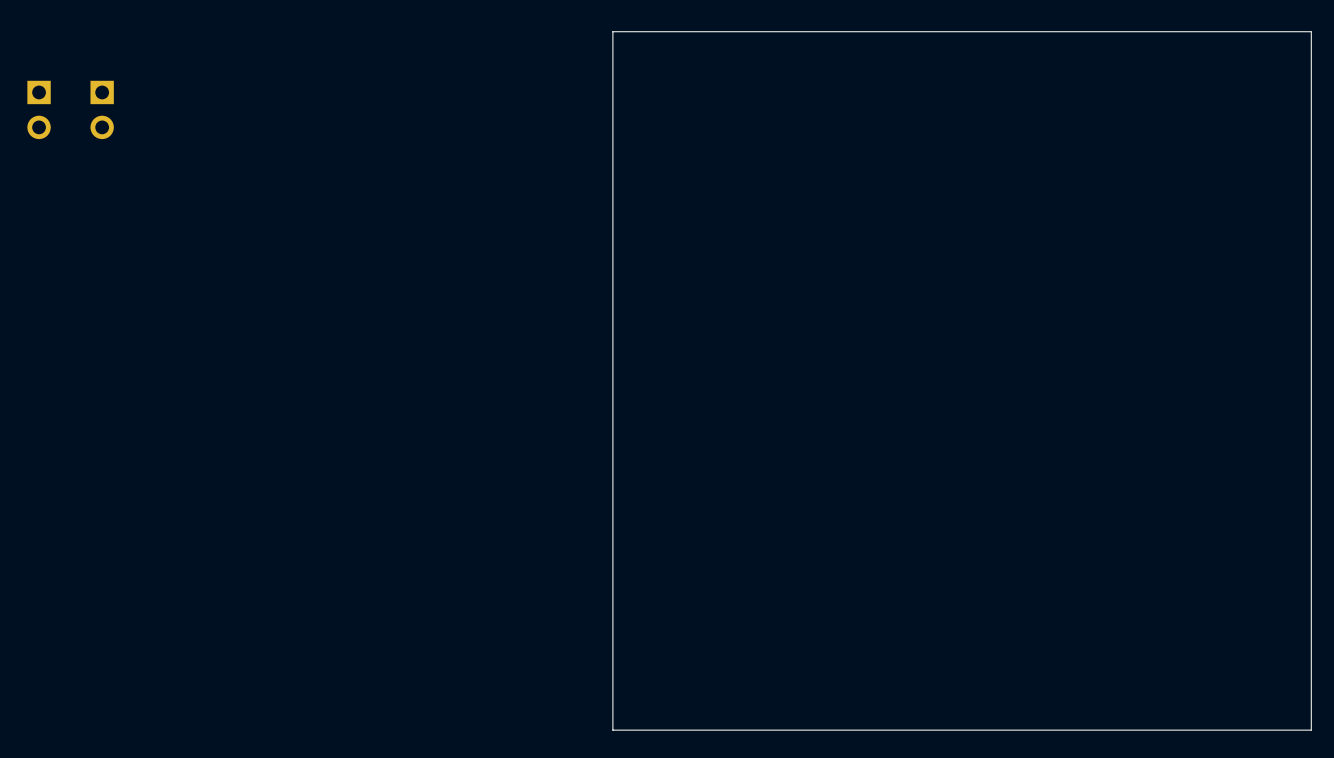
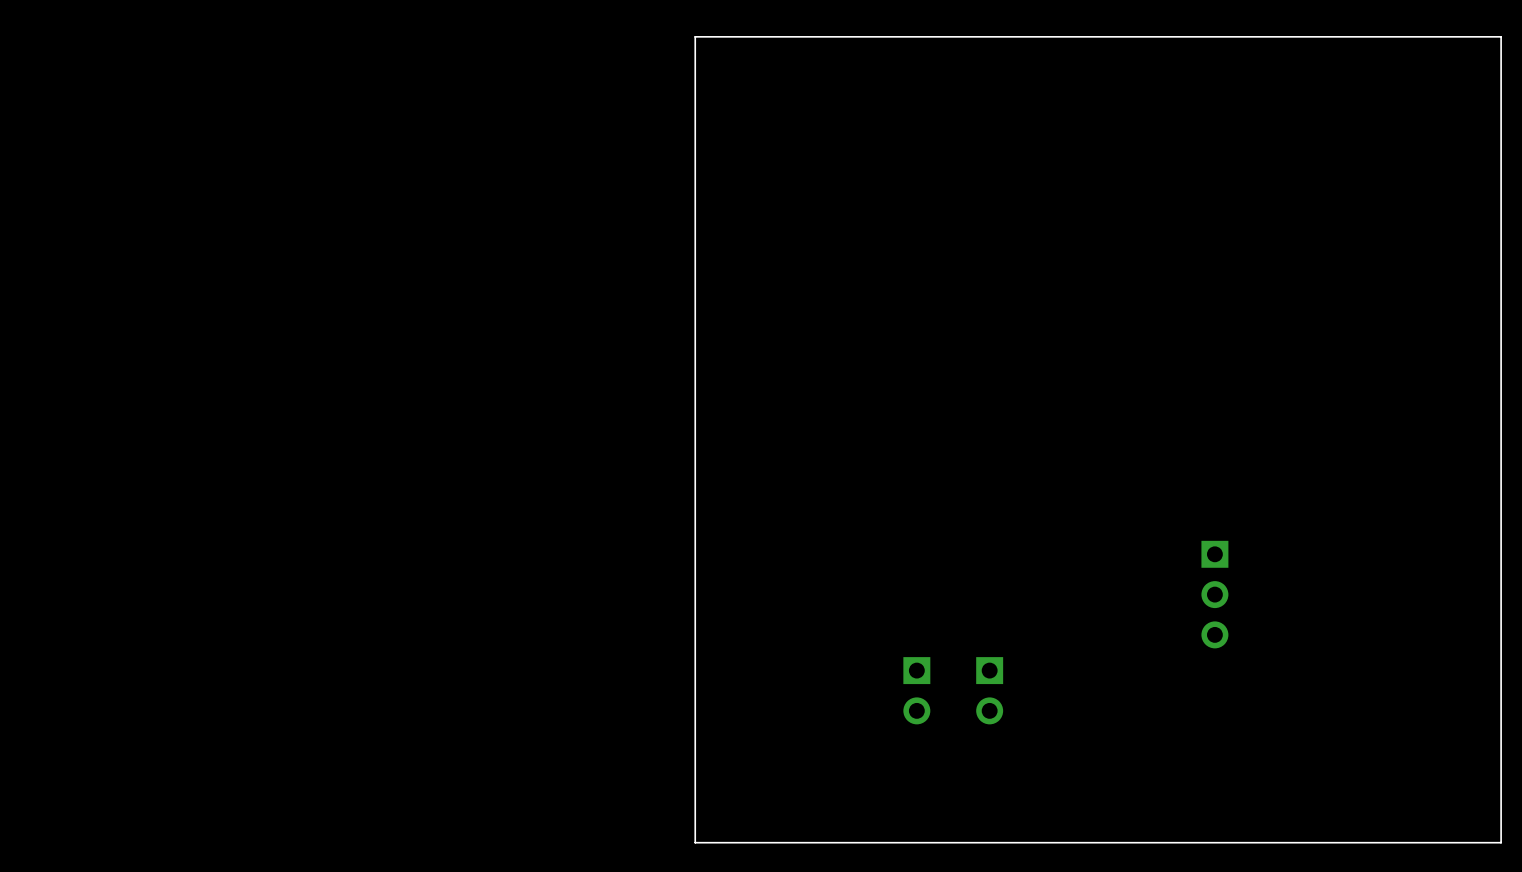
part: (39, 109) -> none
part: (102, 109) -> none
part: none -> (1214, 594)
part: none -> (916, 690)
part: none -> (989, 690)

